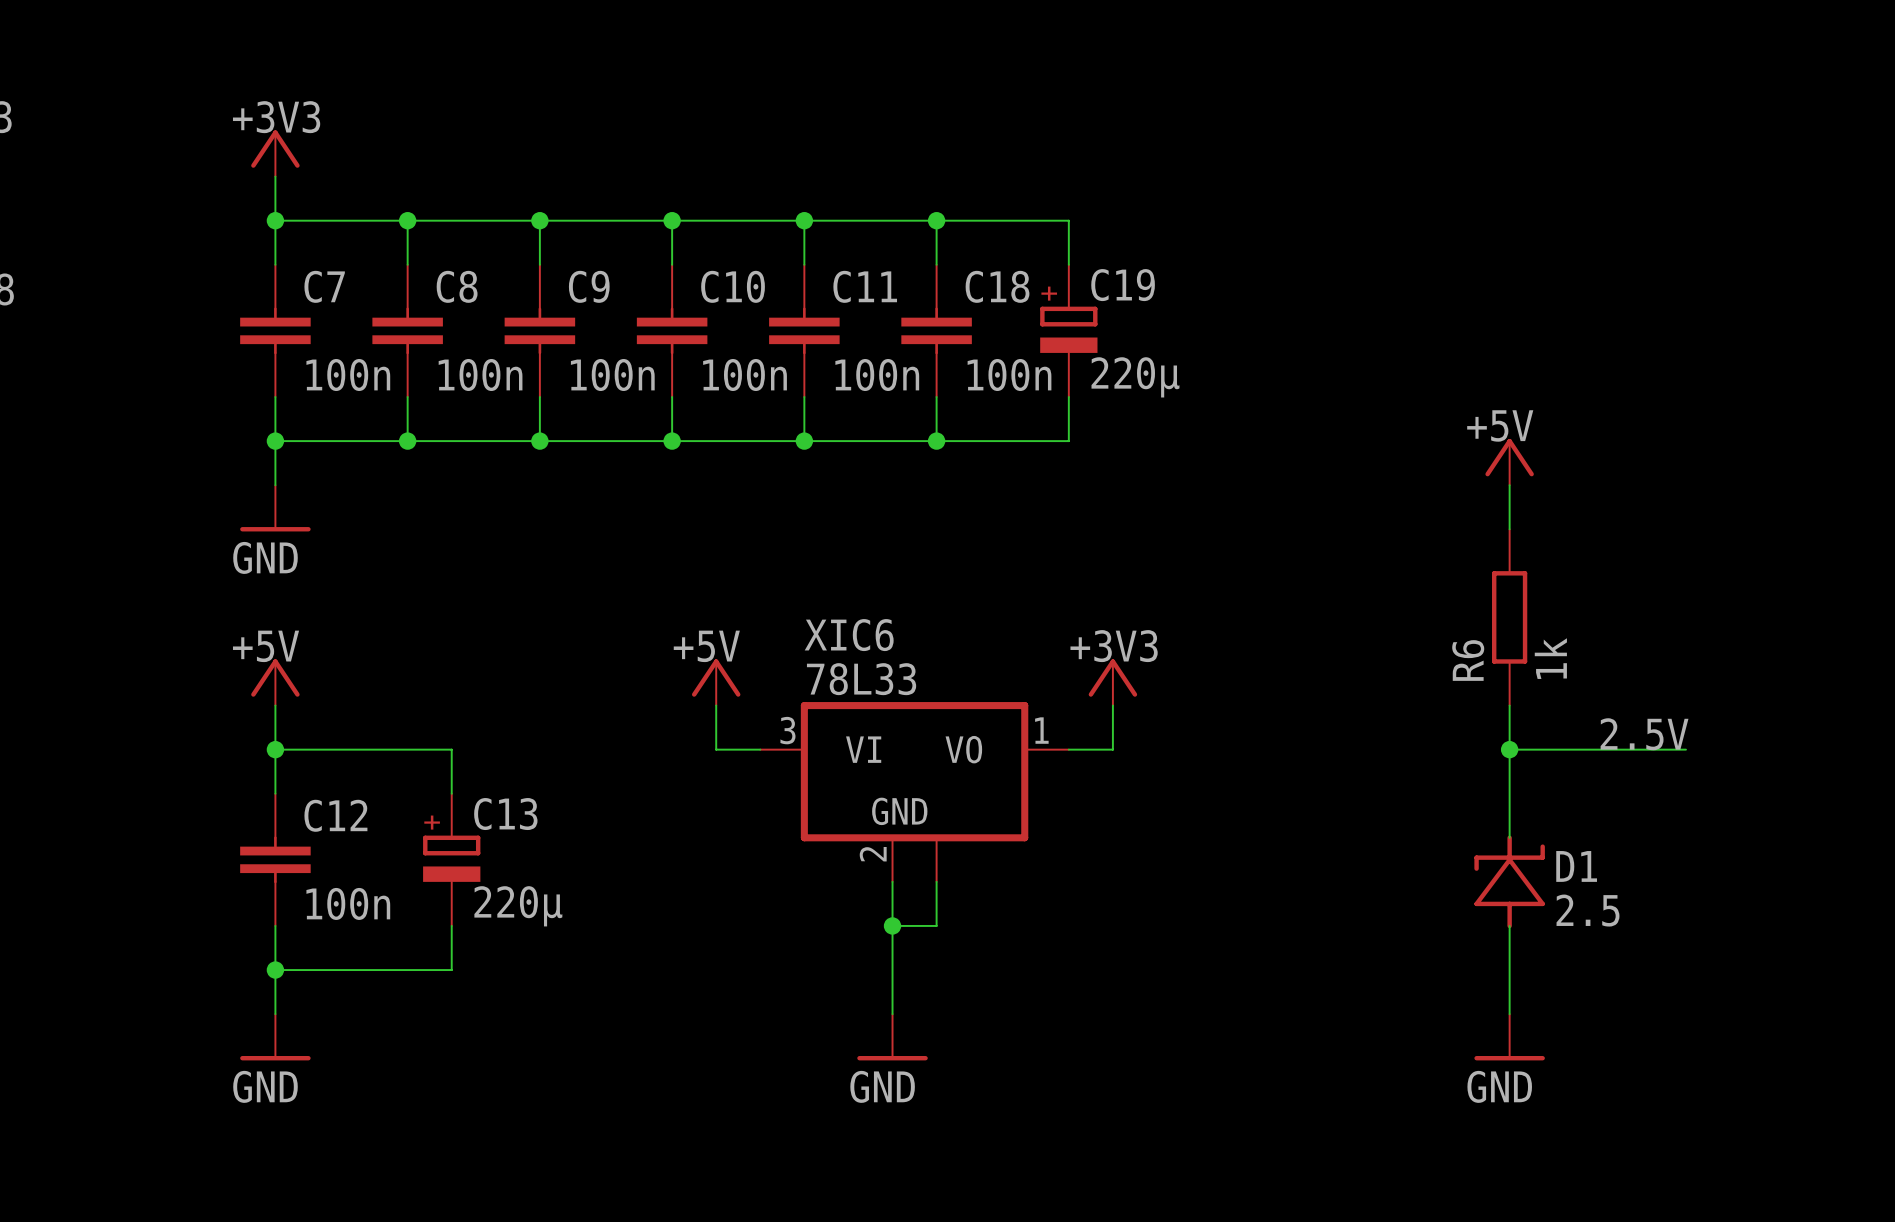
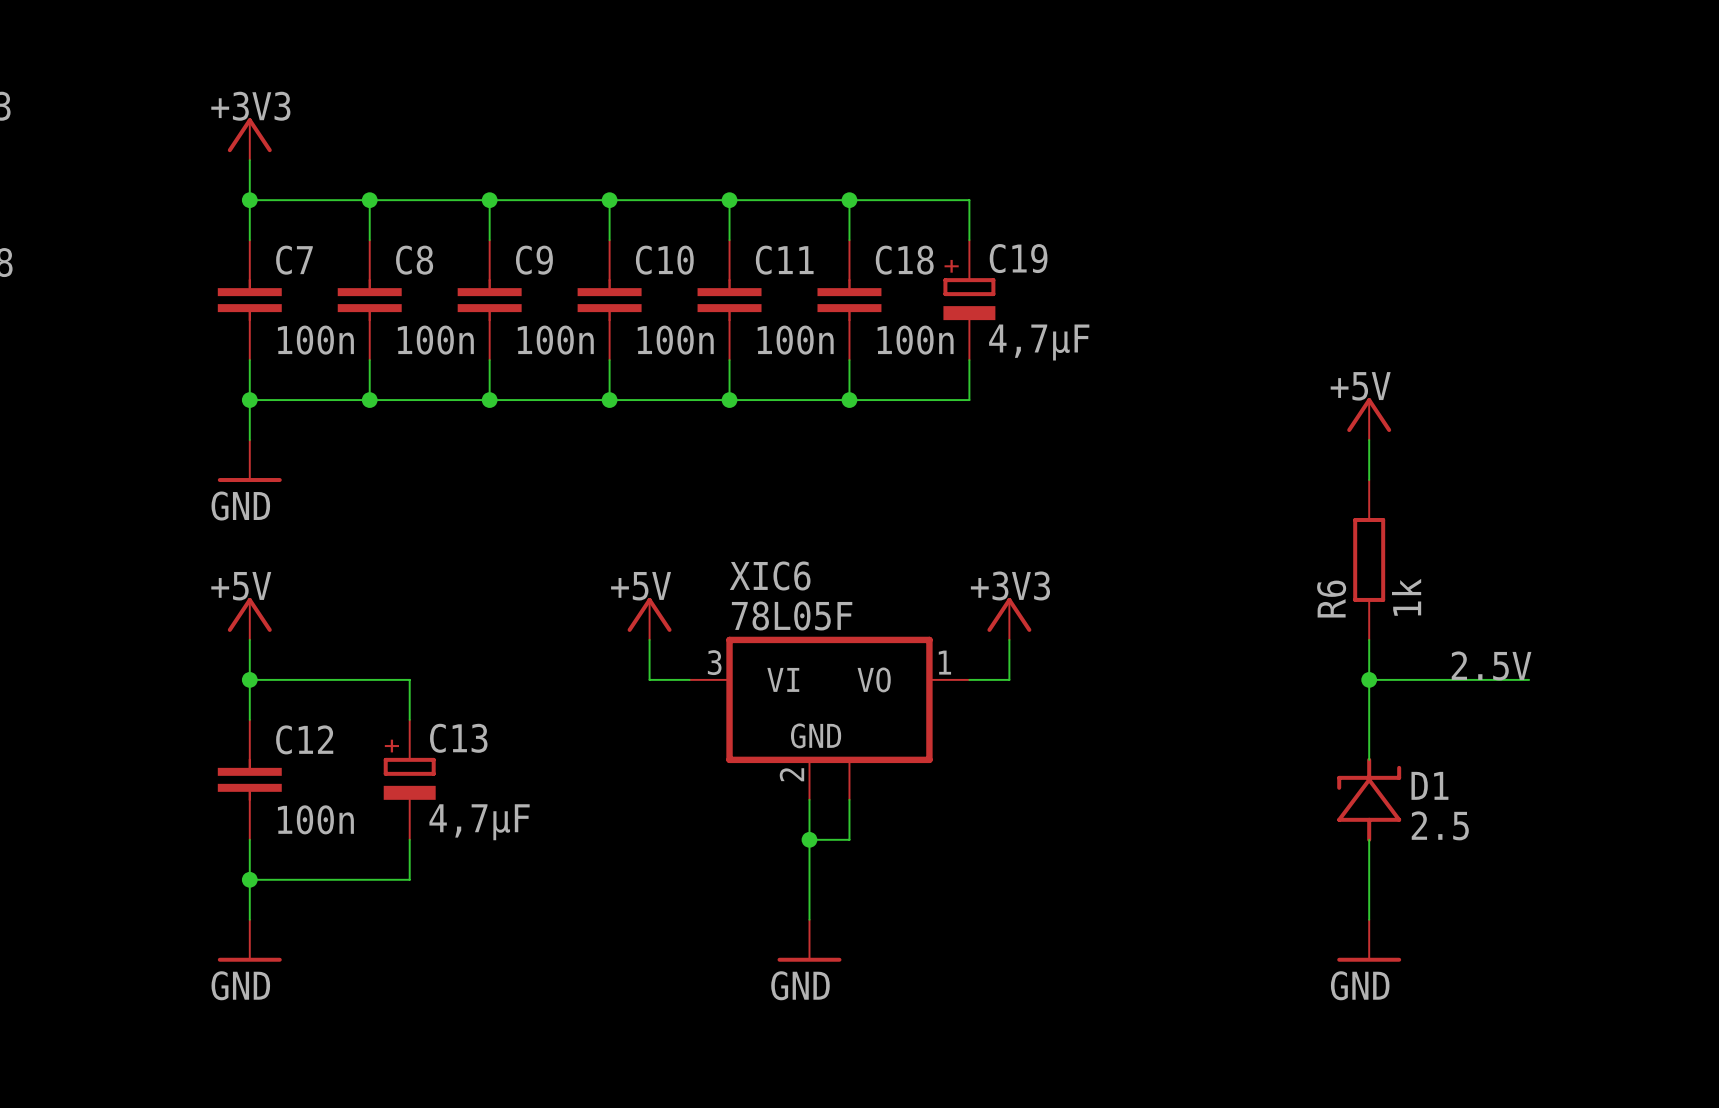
C19 value: 220µ (1135, 377) -> 4,7µF (1039, 342)
XIC6 value: 78L33 (861, 679) -> 78L05F (792, 615)
C13 value: 220µ (518, 906) -> 4,7µF (479, 822)

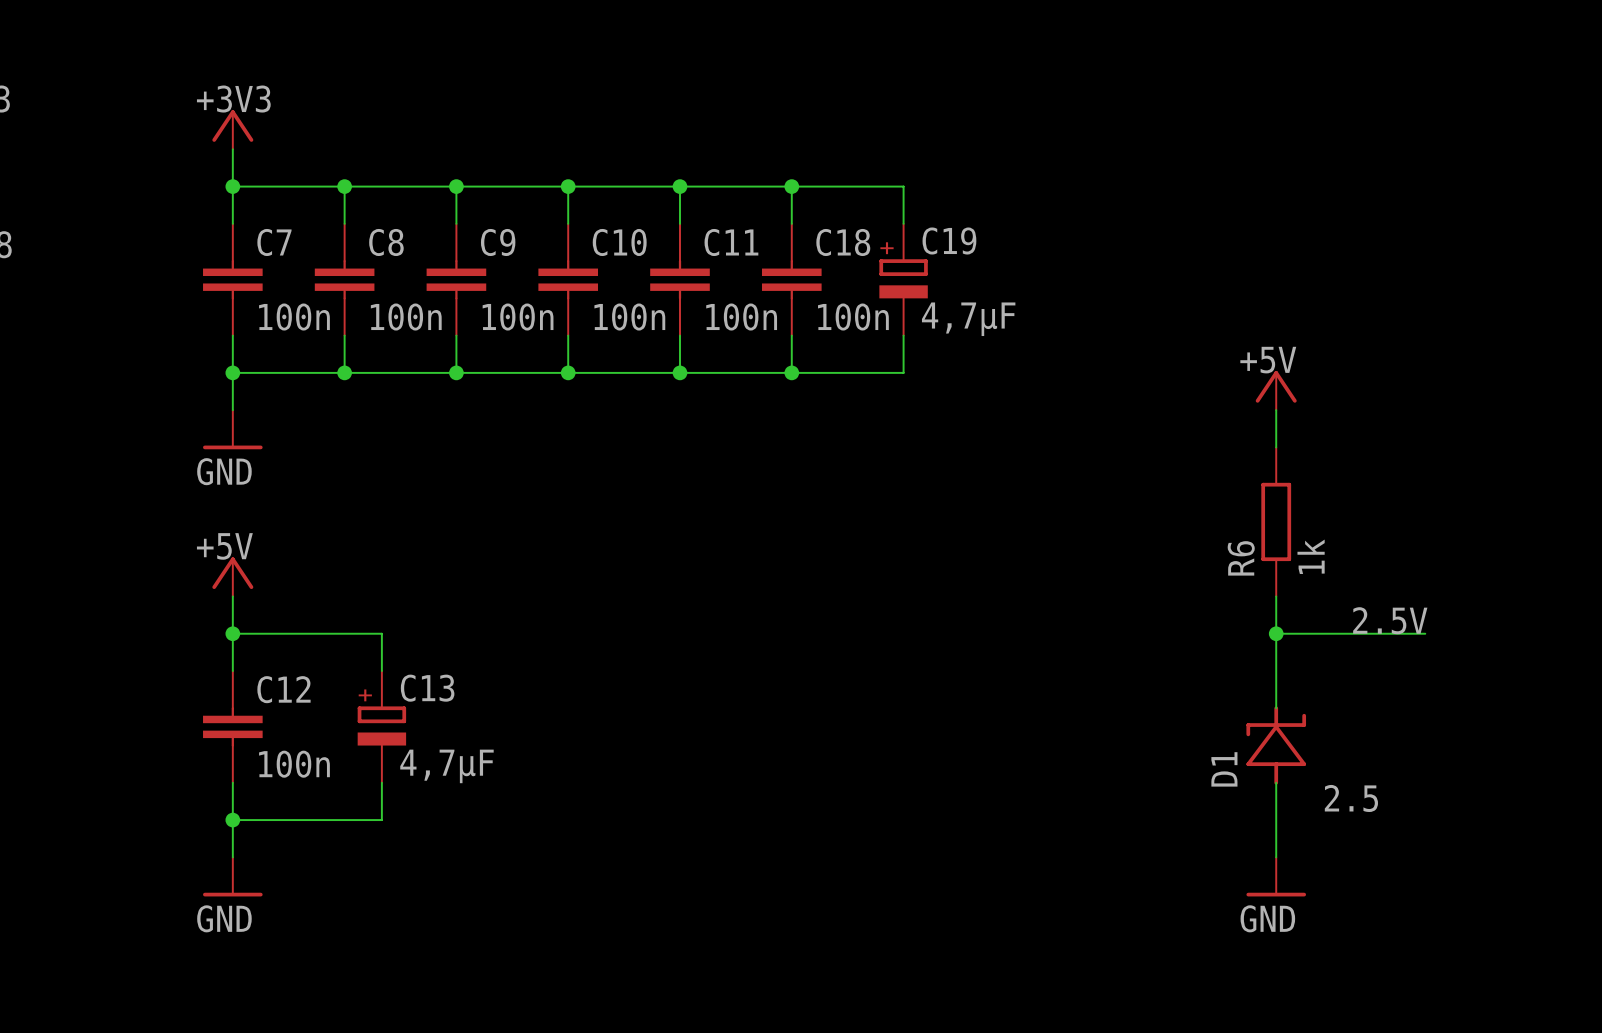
power symbol: +5V (649, 618) -> none
power symbol: +3V3 (1009, 618) -> none
wire: (649, 639) (649, 679) (689, 679) -> none
wire: (1009, 639) (1009, 679) (969, 679) -> none
XIC6: 78L05F (829, 718) -> none
D1 name rotation: 0° (1429, 785) -> 90° counterclockwise (1224, 769)
D1 name position: D1 (1429, 785) -> D1 (1224, 769)
wire: (809, 799) (809, 919) -> none
wire: (849, 799) (849, 839) (809, 839) -> none
D1 value position: 2.5 (1440, 825) -> 2.5 (1351, 798)
junction: (809, 839) -> none
power symbol: GND (809, 940) -> none

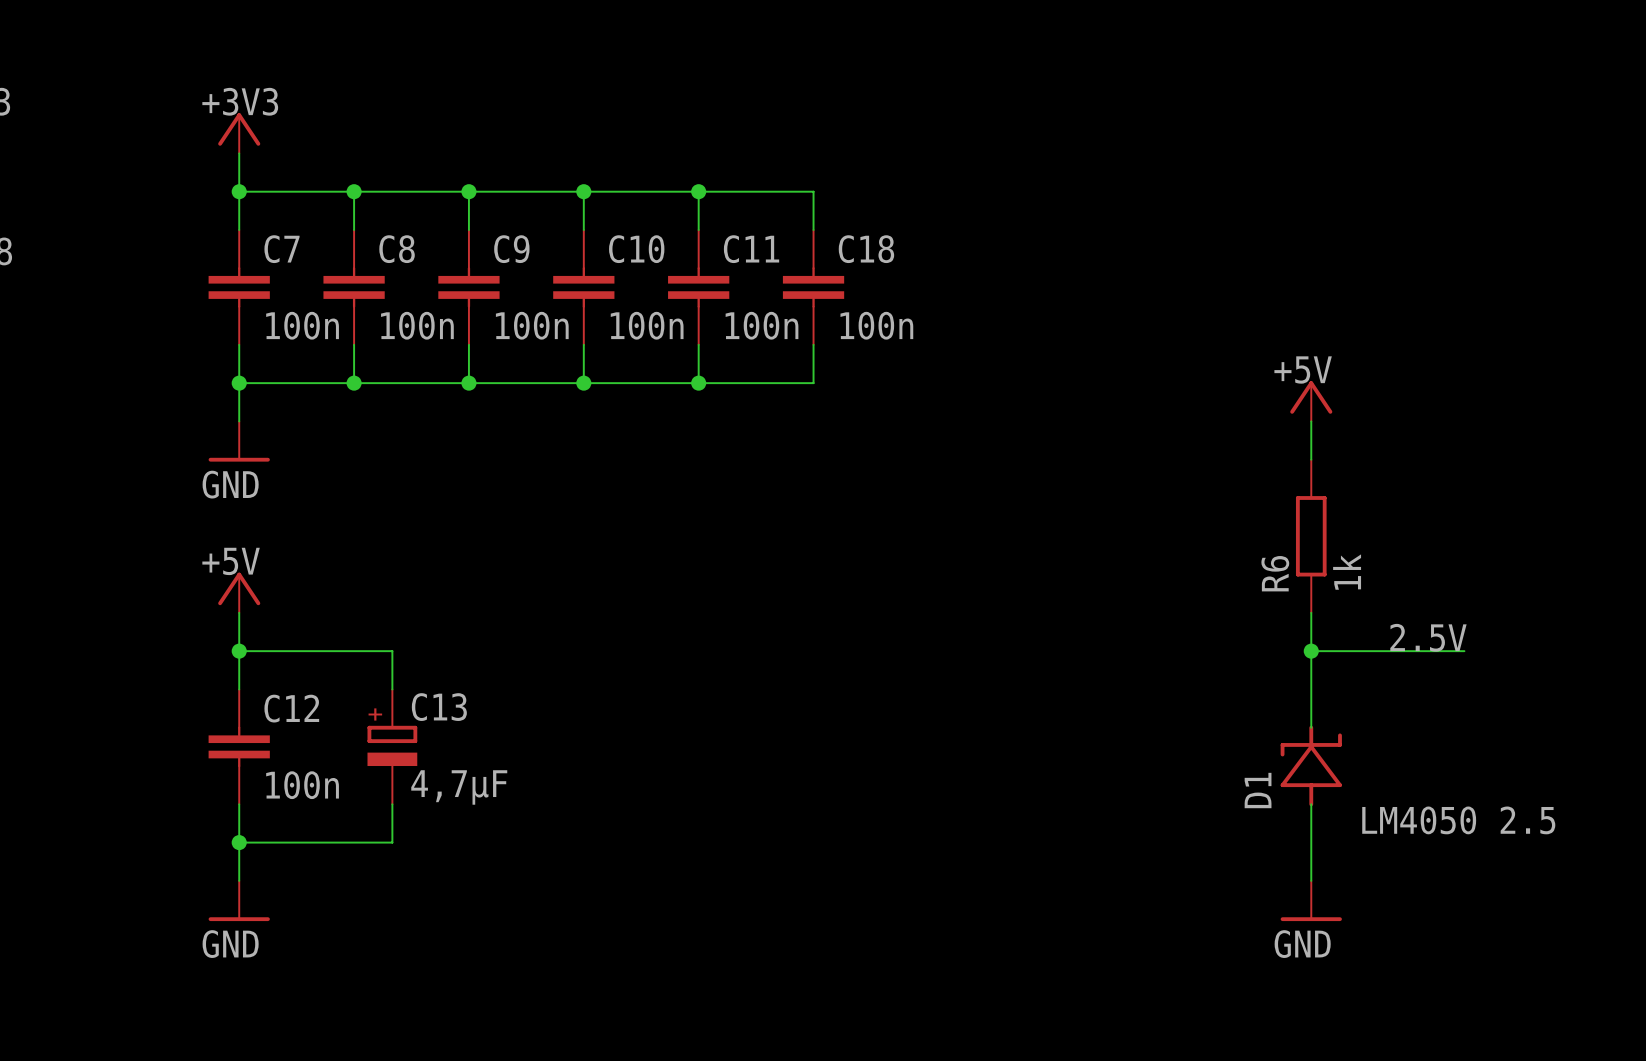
wire: (791, 186) (903, 186) (903, 223) -> none
junction: (791, 186) -> none
C19: 4,7µF (903, 279) -> none
wire: (903, 335) (903, 372) (791, 372) -> none
junction: (791, 372) -> none
D1 value: 2.5 (1351, 798) -> LM4050 2.5 (1458, 820)

